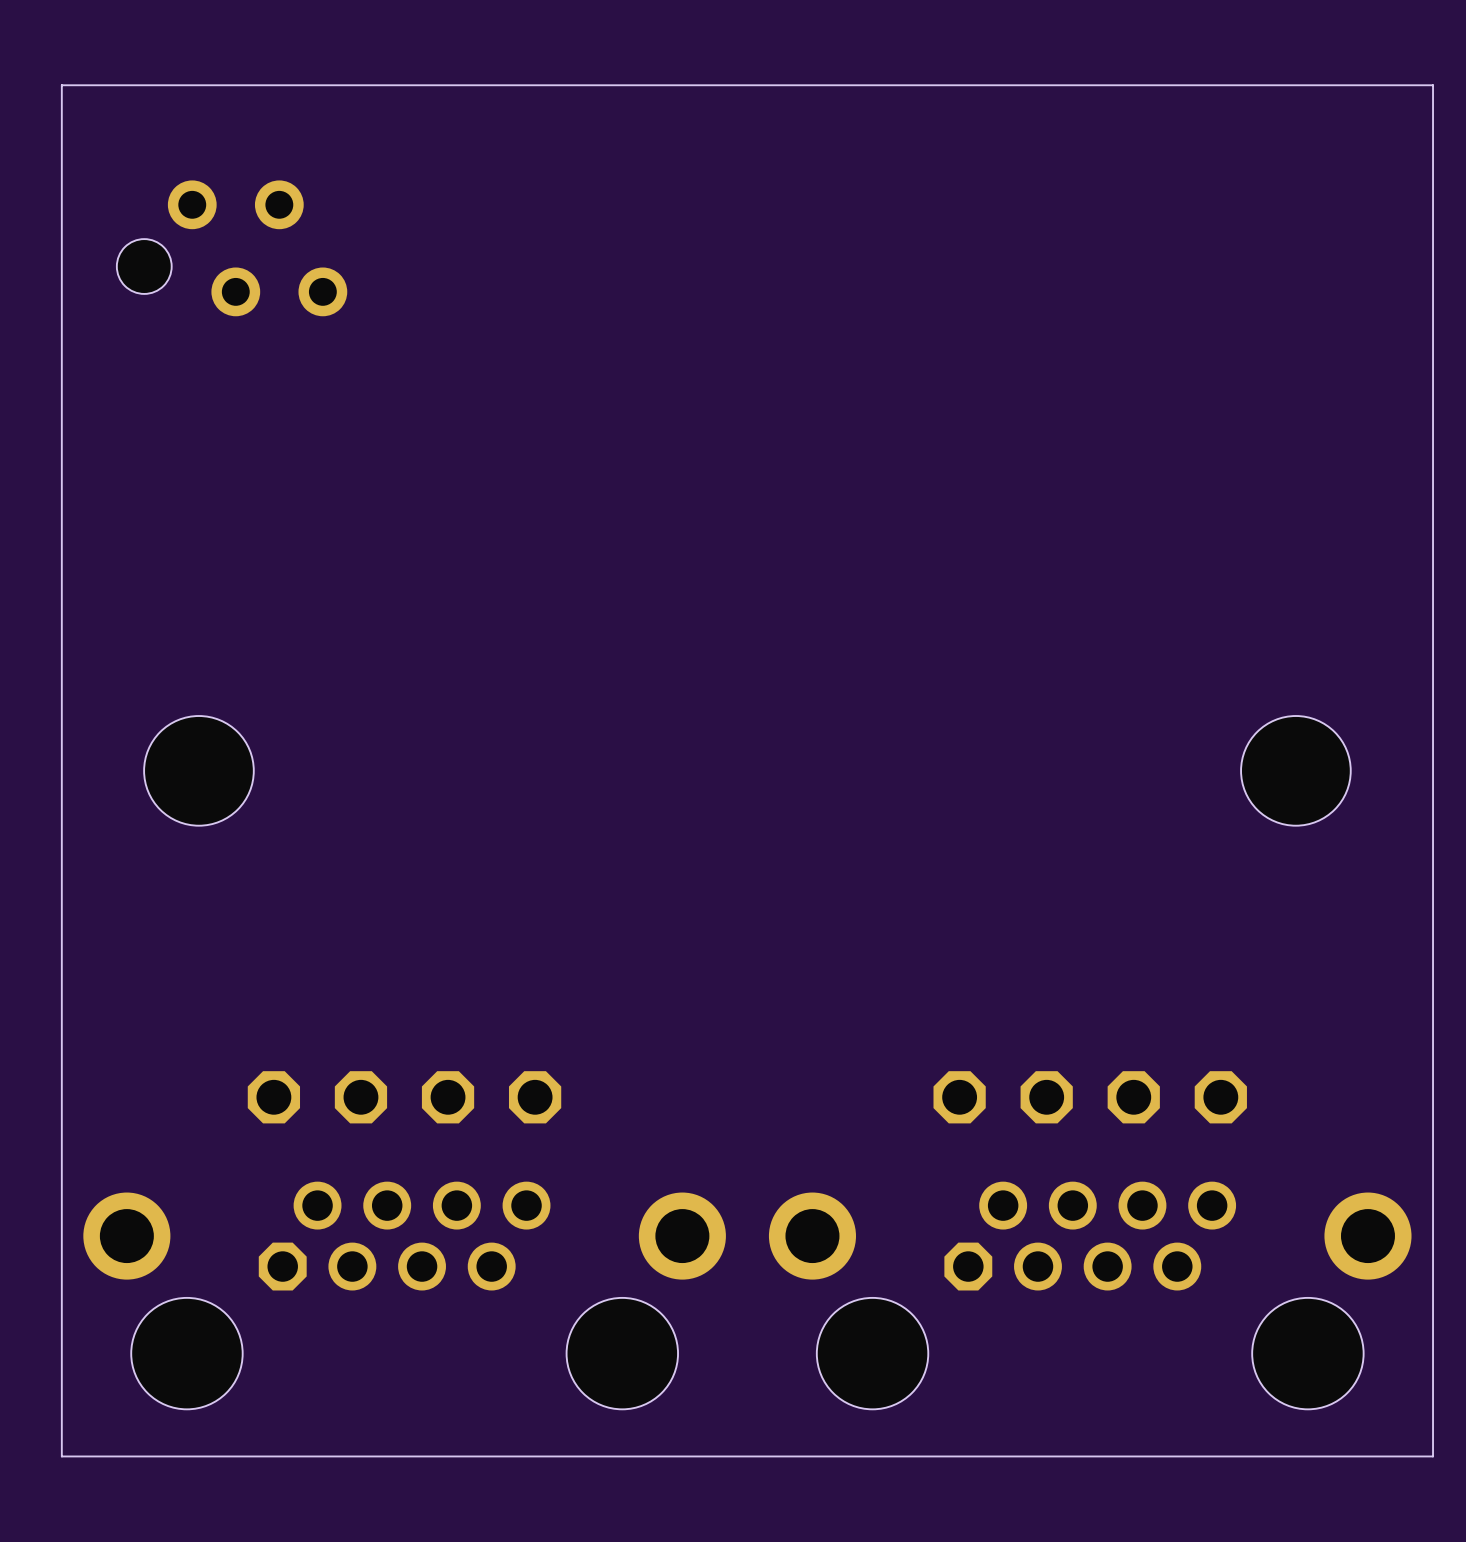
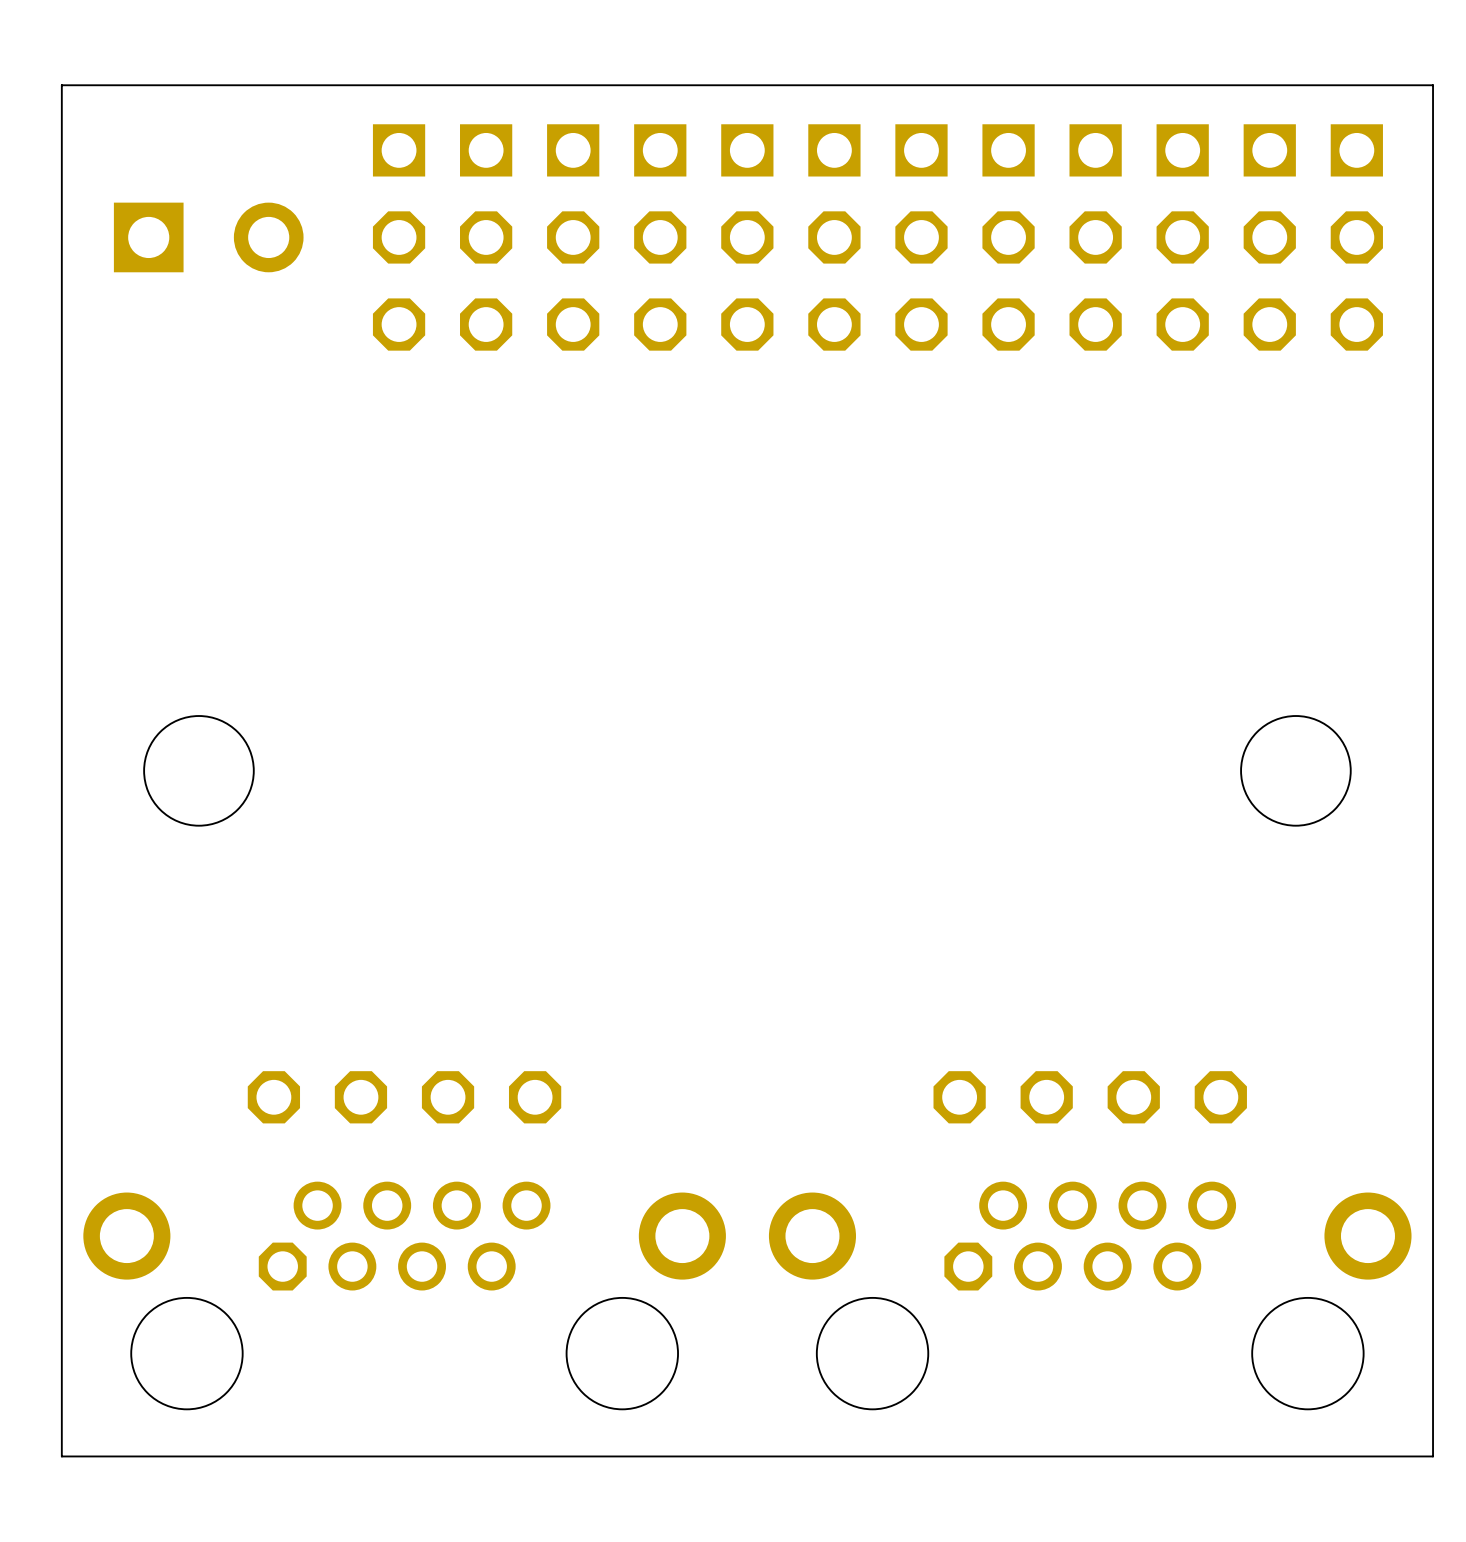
part footprint: [116, 180, 348, 317] -> [113, 202, 304, 273]
part: none -> (399, 237)
part: none -> (486, 237)
part: none -> (573, 237)
part: none -> (660, 237)
part: none -> (747, 237)
part: none -> (834, 237)
part: none -> (921, 237)
part: none -> (1008, 237)
part: none -> (1095, 237)
part: none -> (1182, 237)
part: none -> (1269, 237)
part: none -> (1356, 237)

